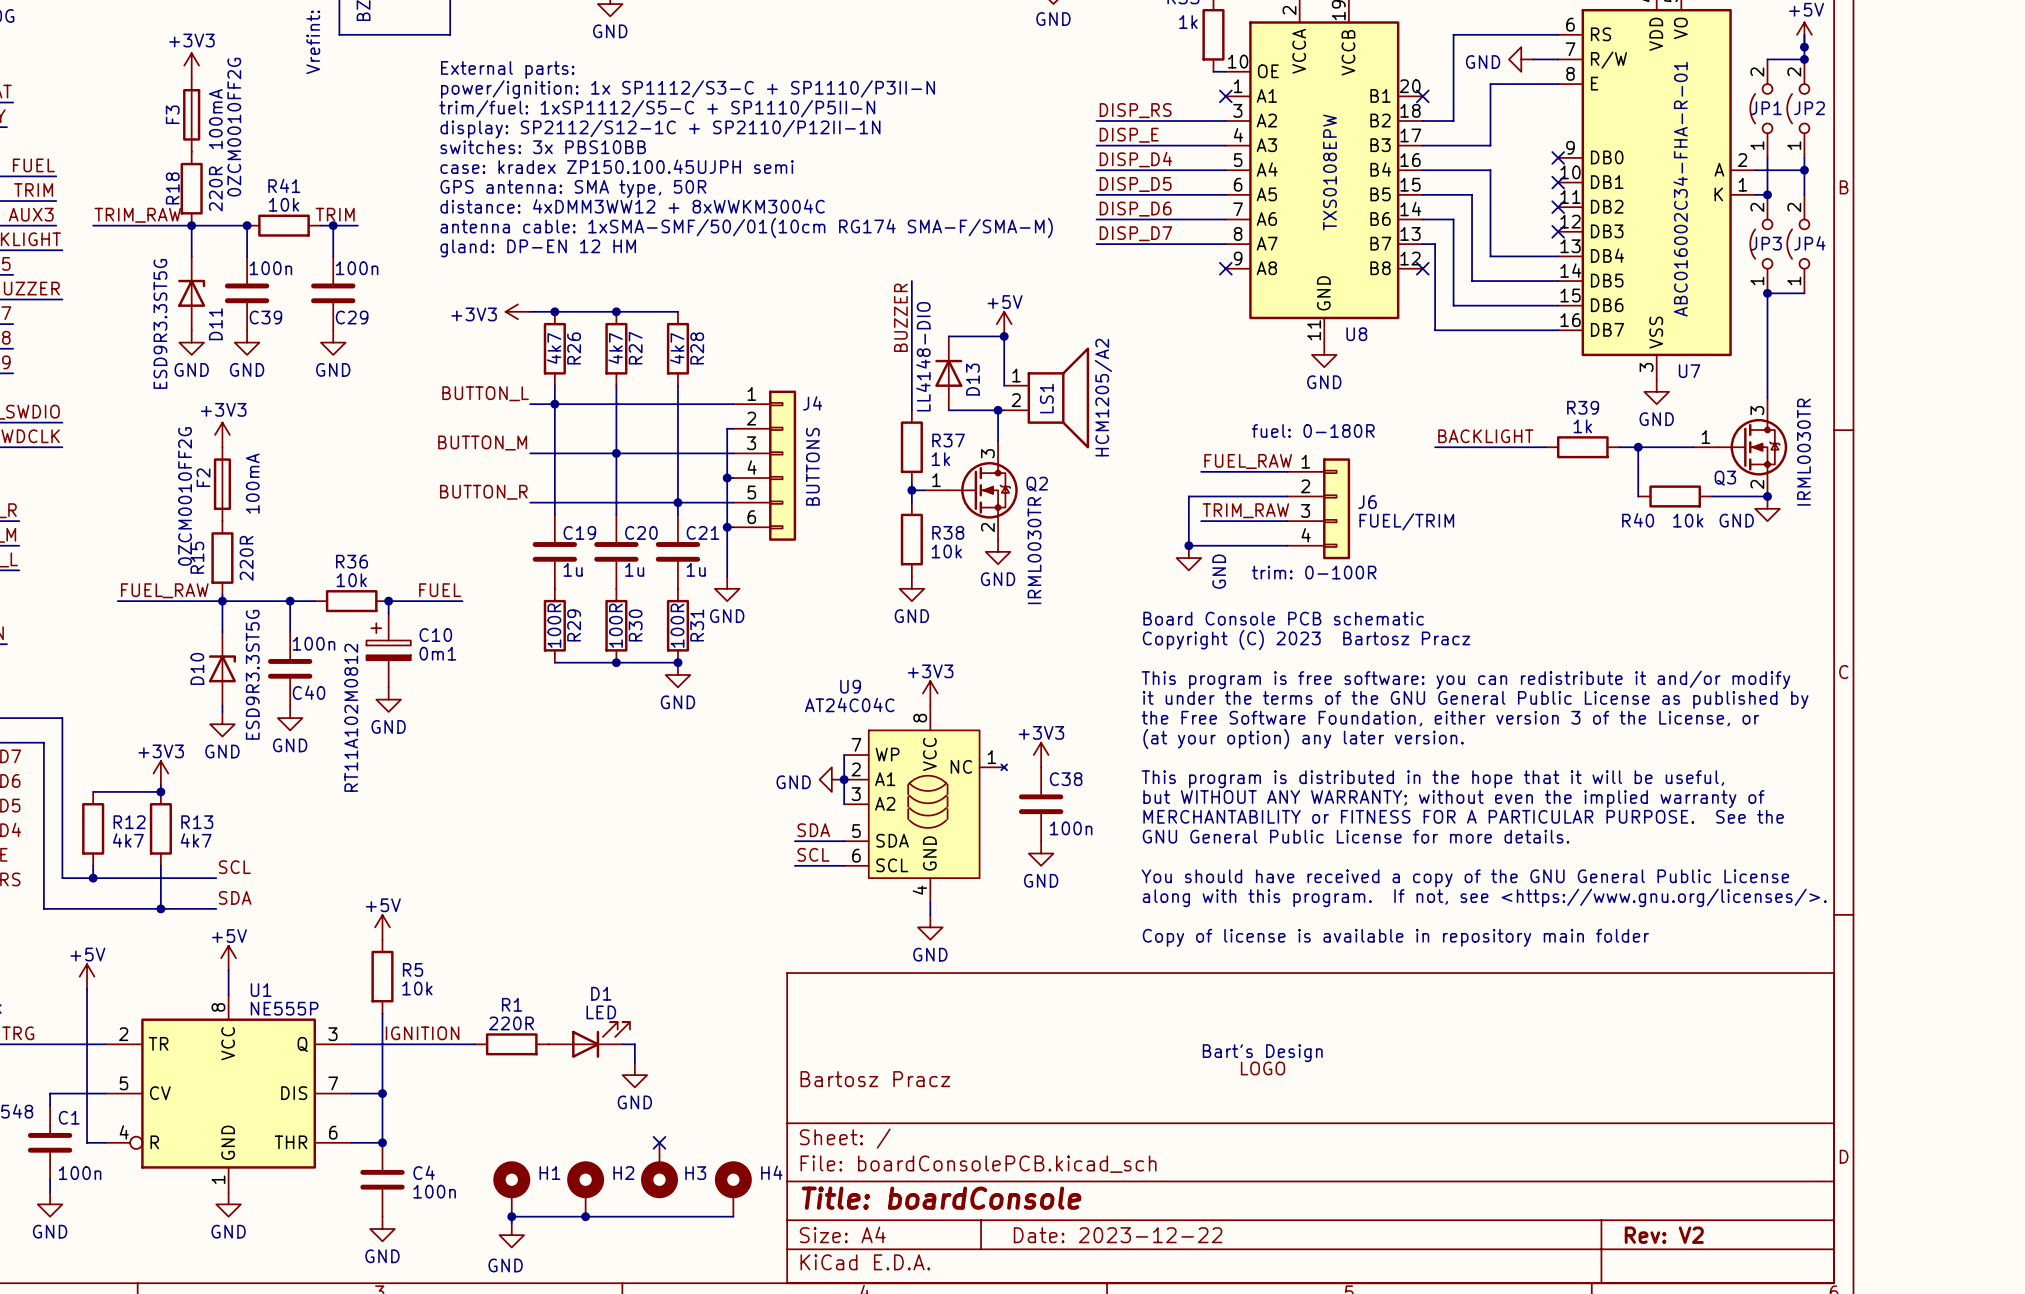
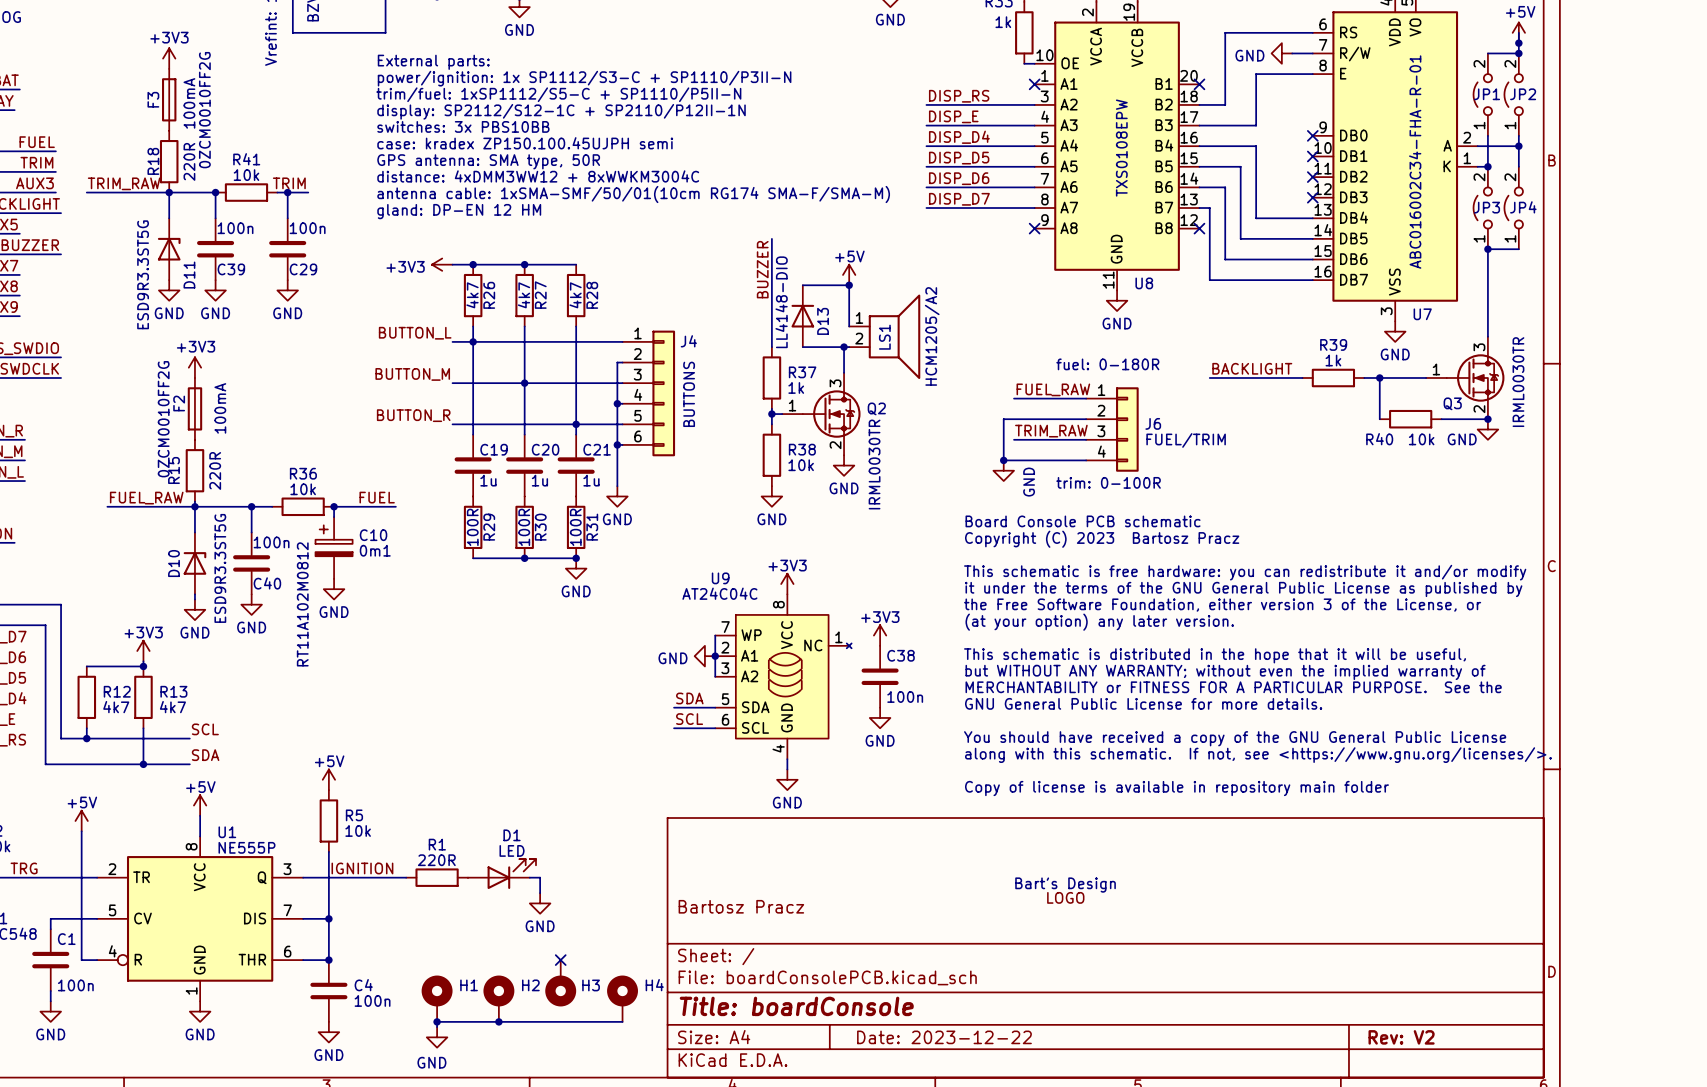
text: This program is free software: you can redistribute it and/or modify (1465, 679) -> This schematic is free hardware: you can redistribute it and/or modify (1245, 572)
text: This program is distributed in the hope that it will be useful, (1432, 779) -> This schematic is distributed in the hope that it will be useful, (1215, 655)
text: along with this program. If not, see <https://www.gnu.org/licenses/>. (1484, 897) -> along with this schematic. If not, see <https://www.gnu.org/licenses/>. (1258, 755)

